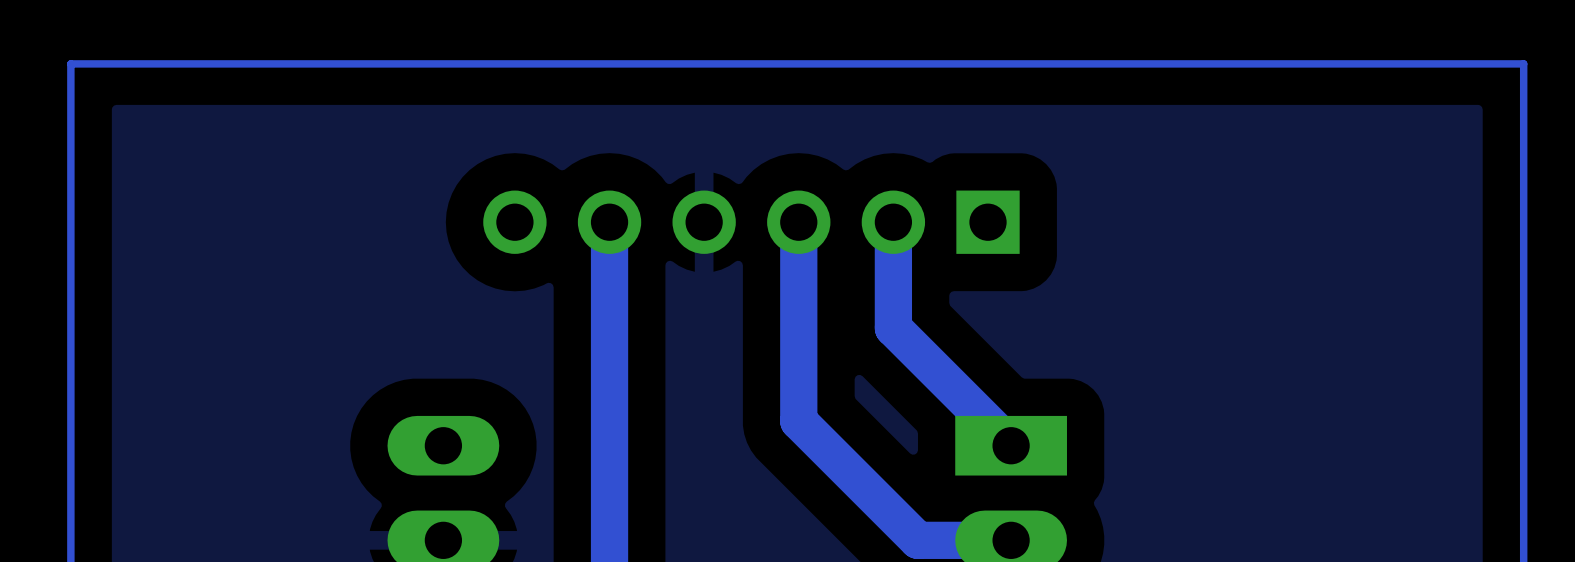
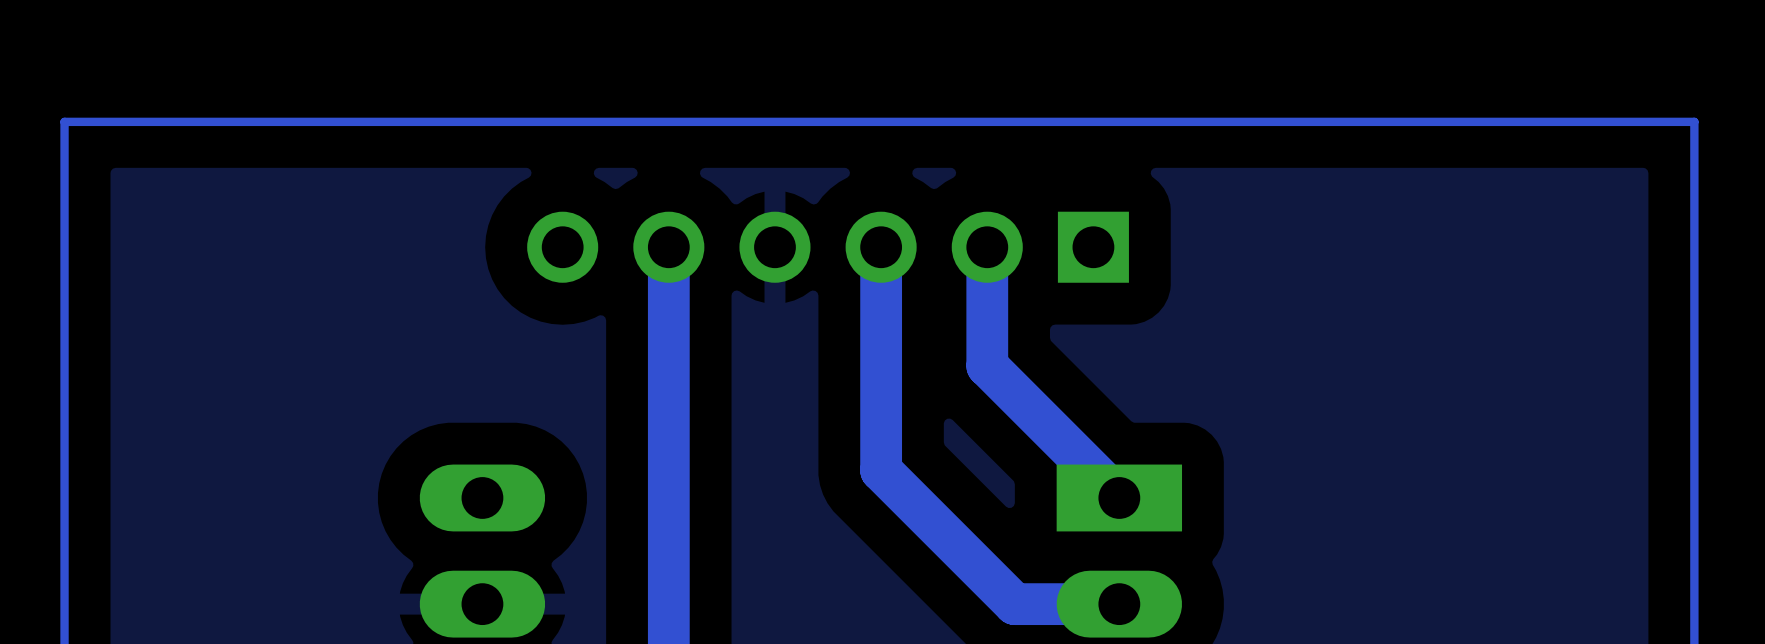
track: (1523, 110) (1523, 63) (70, 63) (70, 110) -> (1694, 121) (64, 121)

